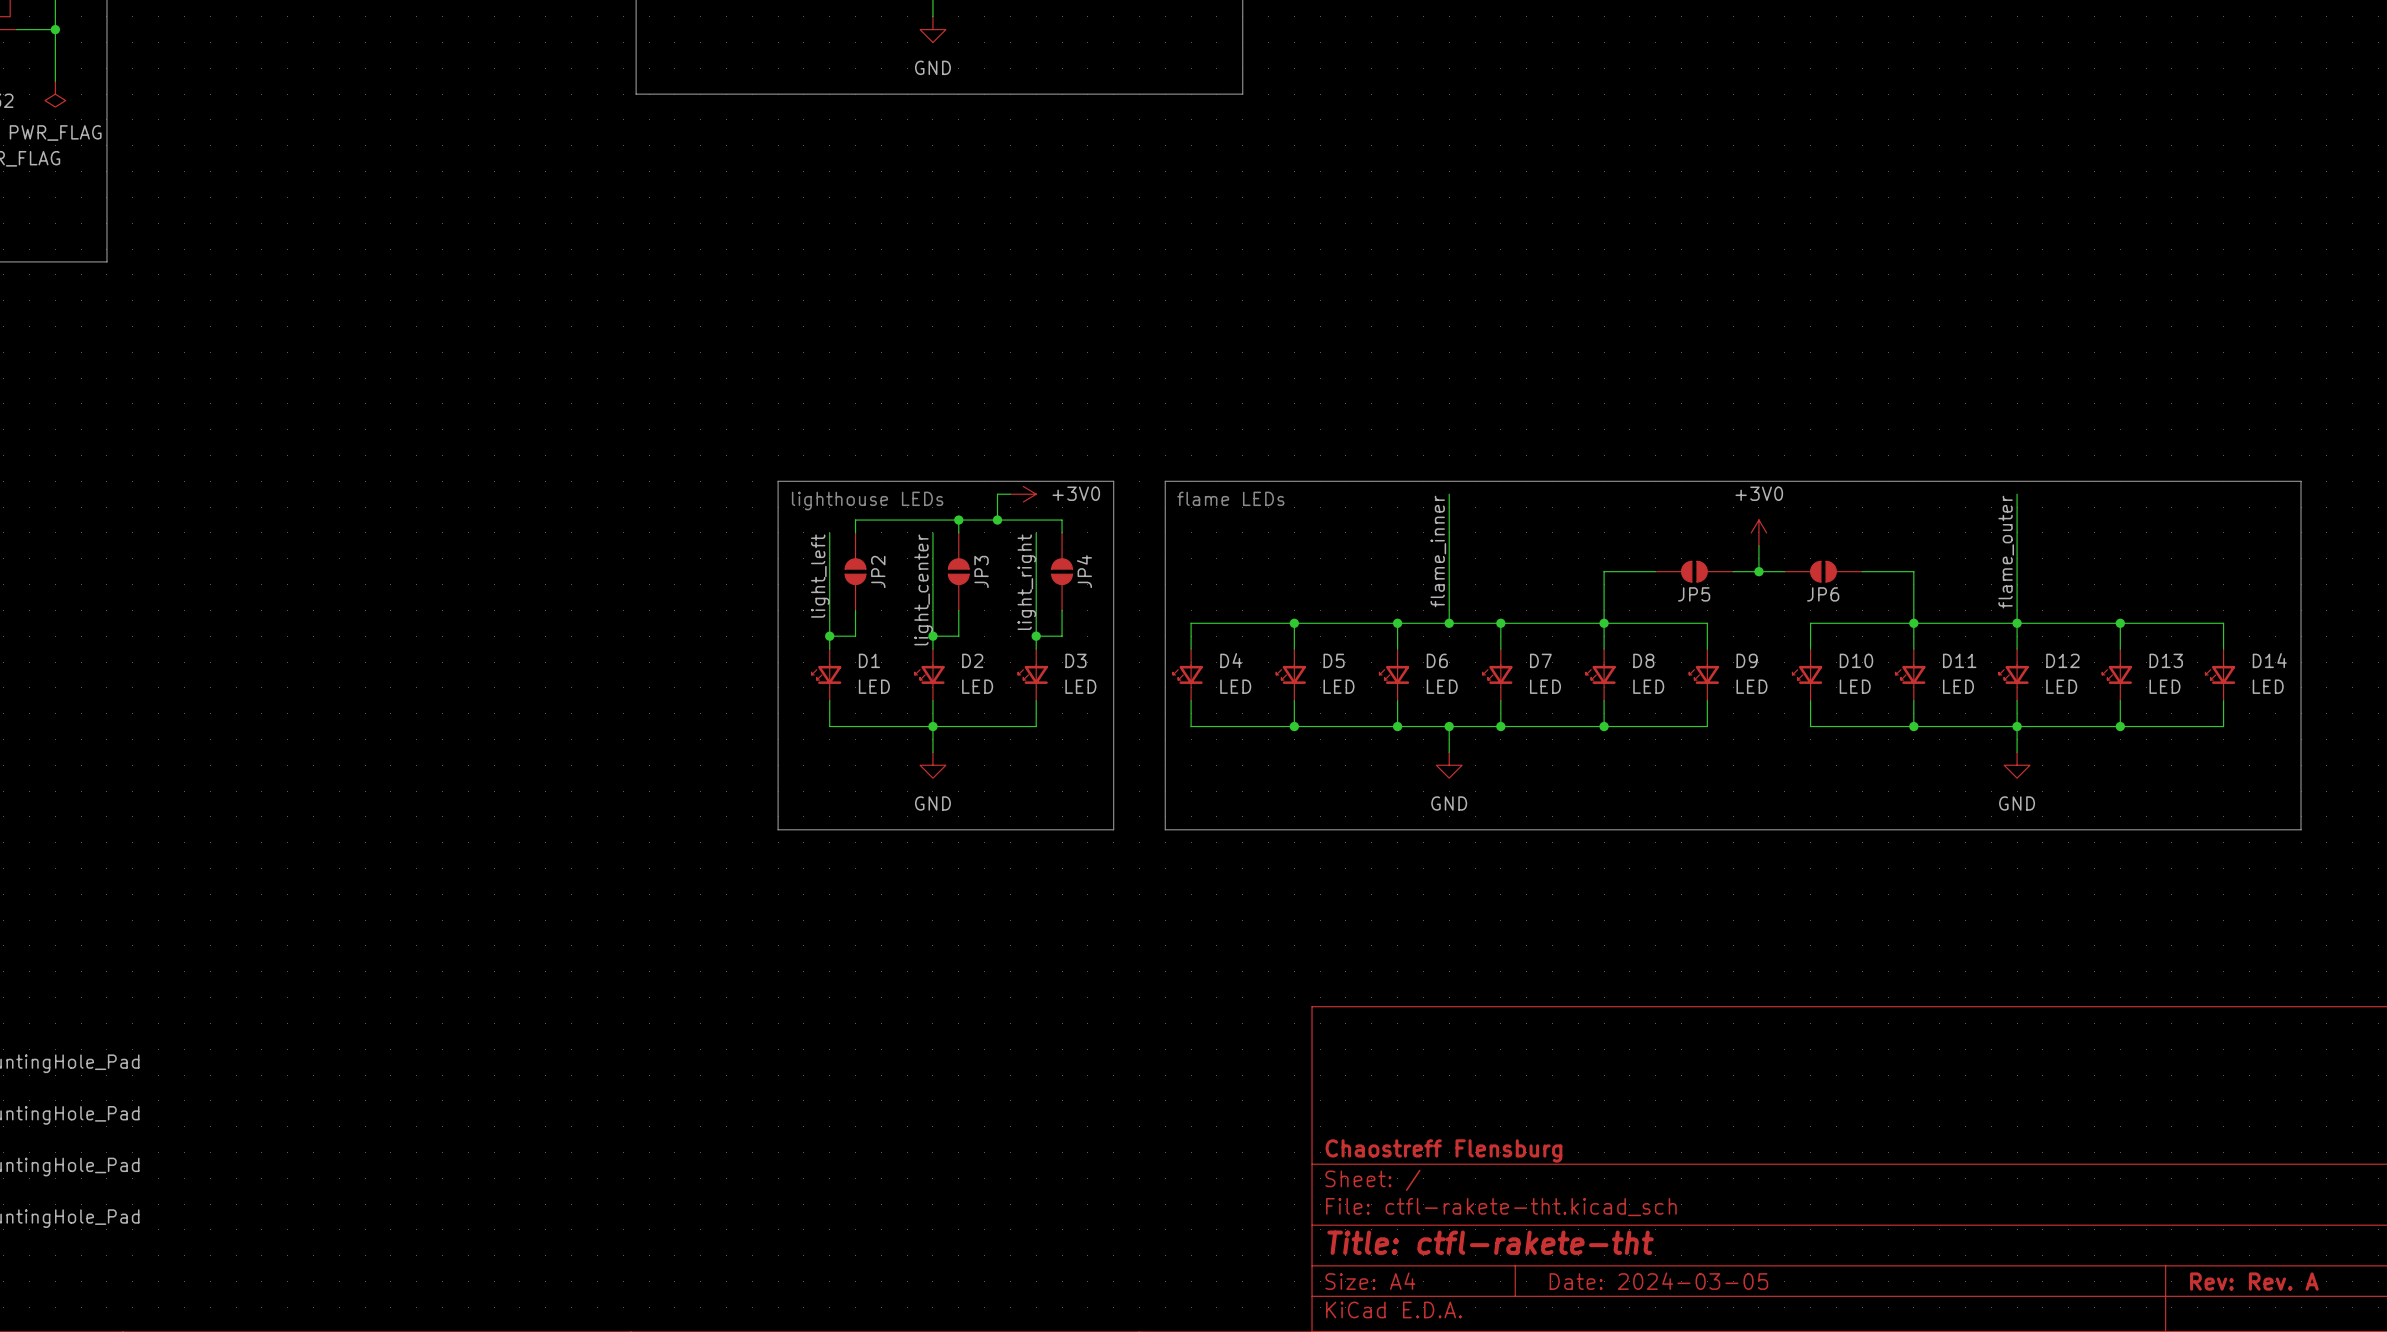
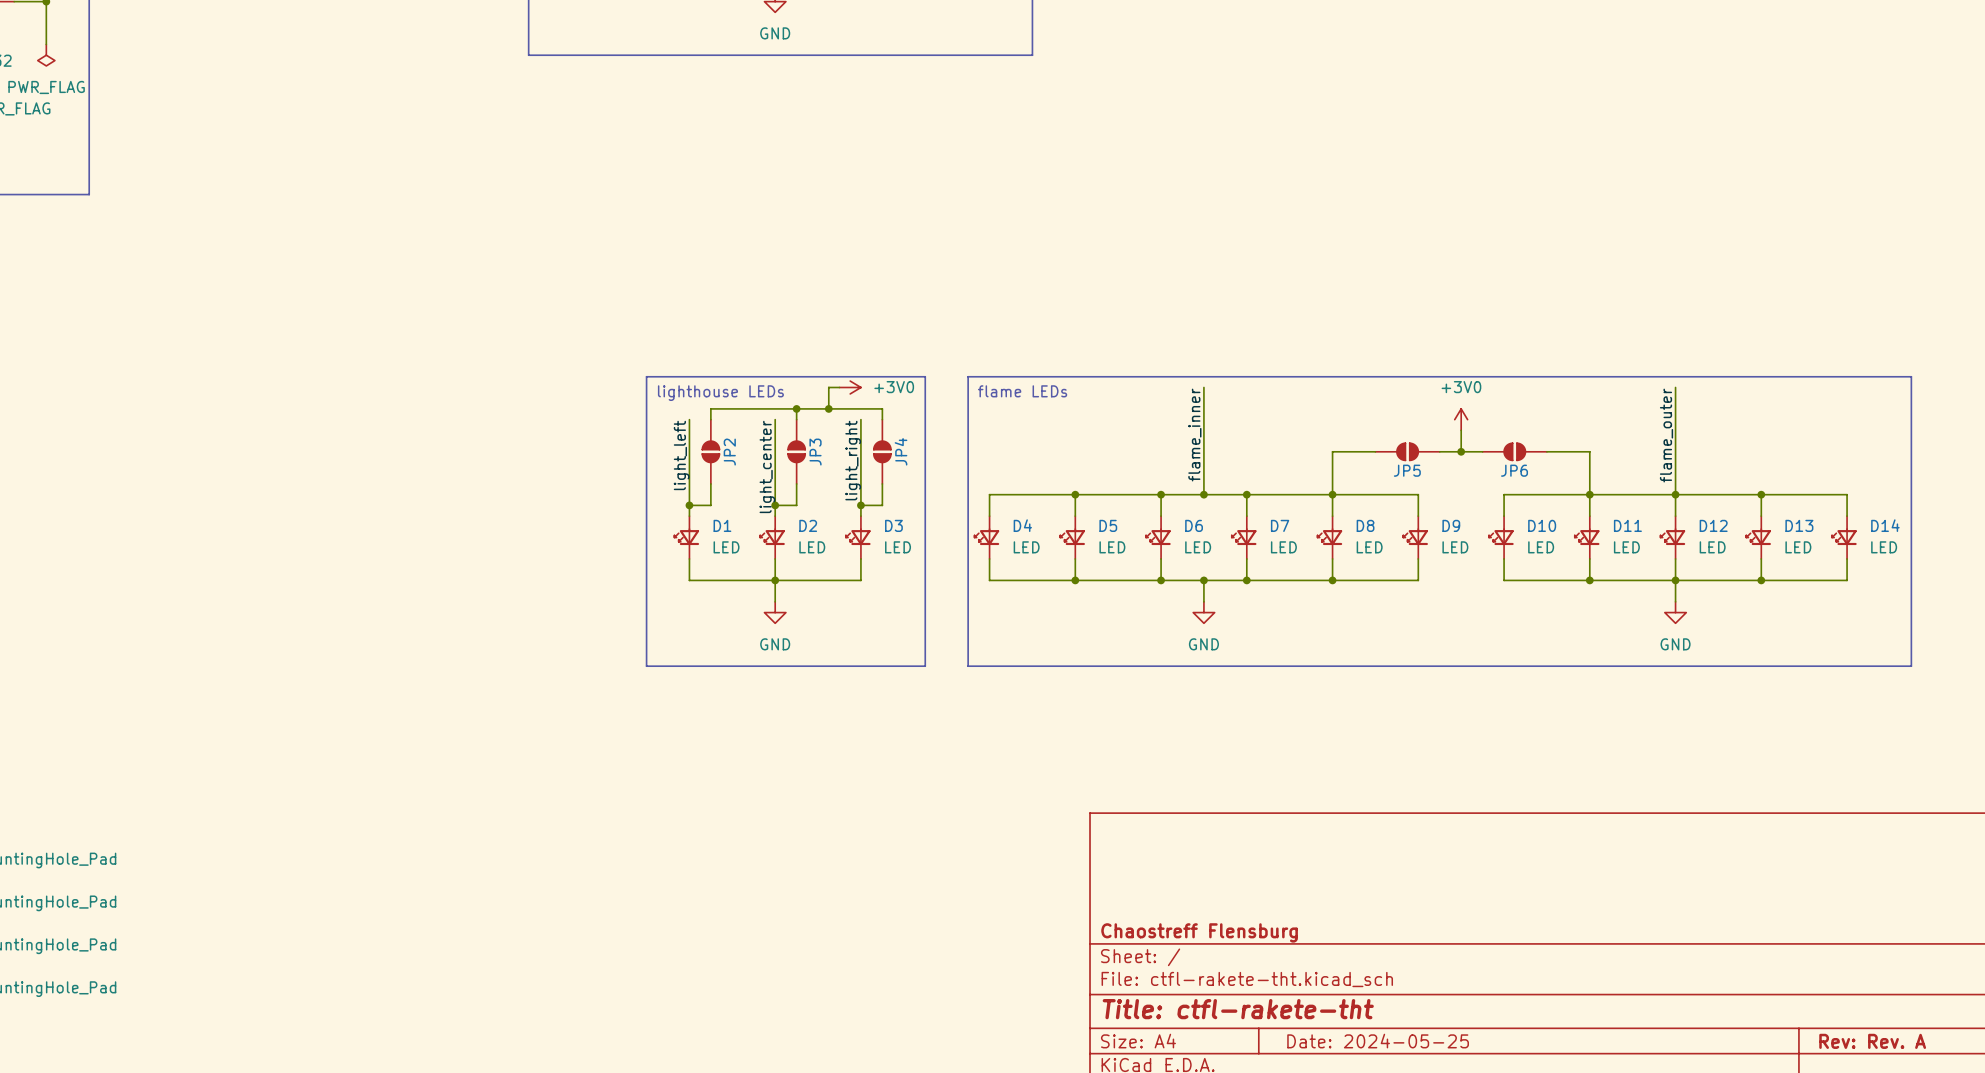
title block: Date: 2024-03-05 (1658, 1281) -> Date: 2024-05-25 (1378, 1041)

